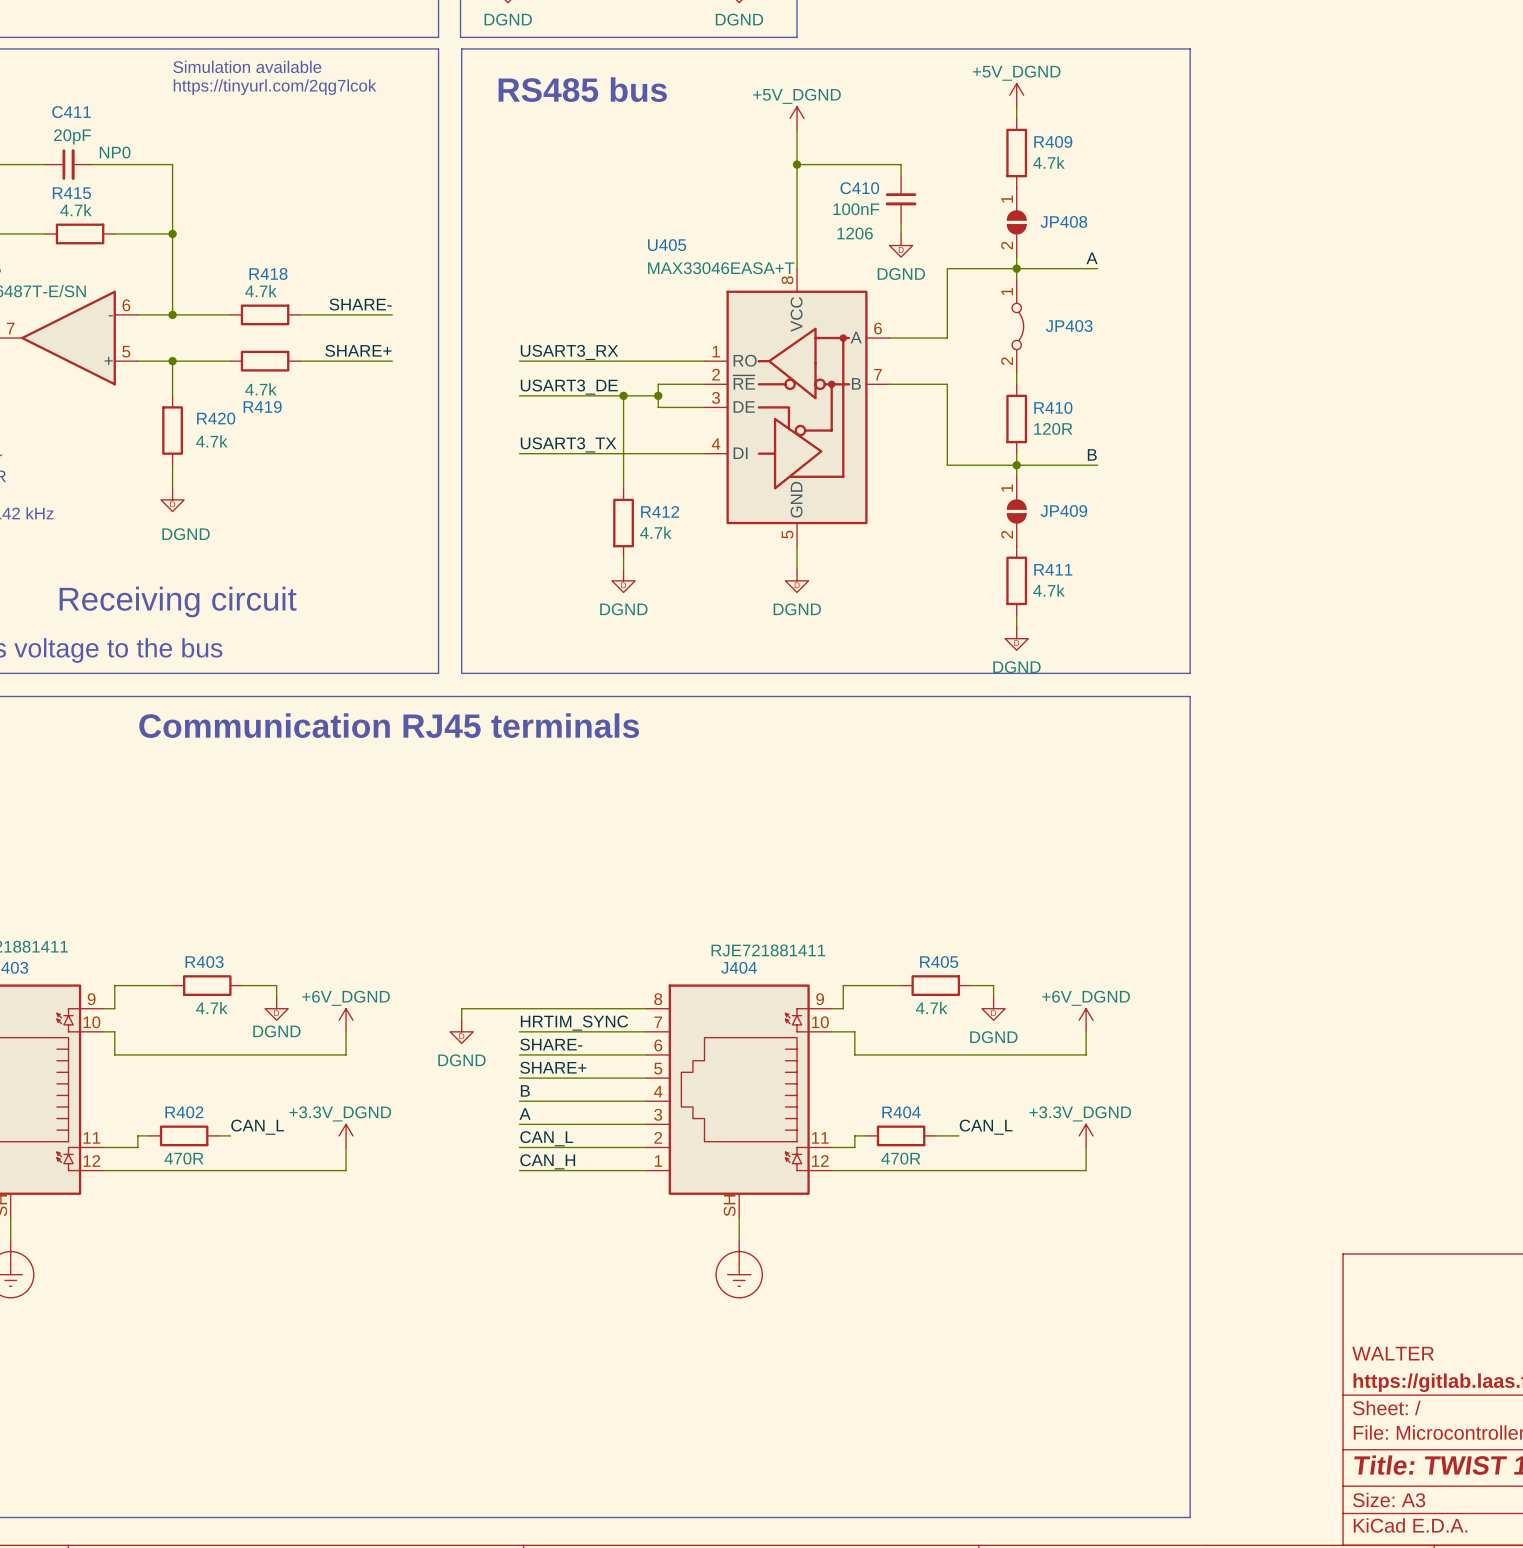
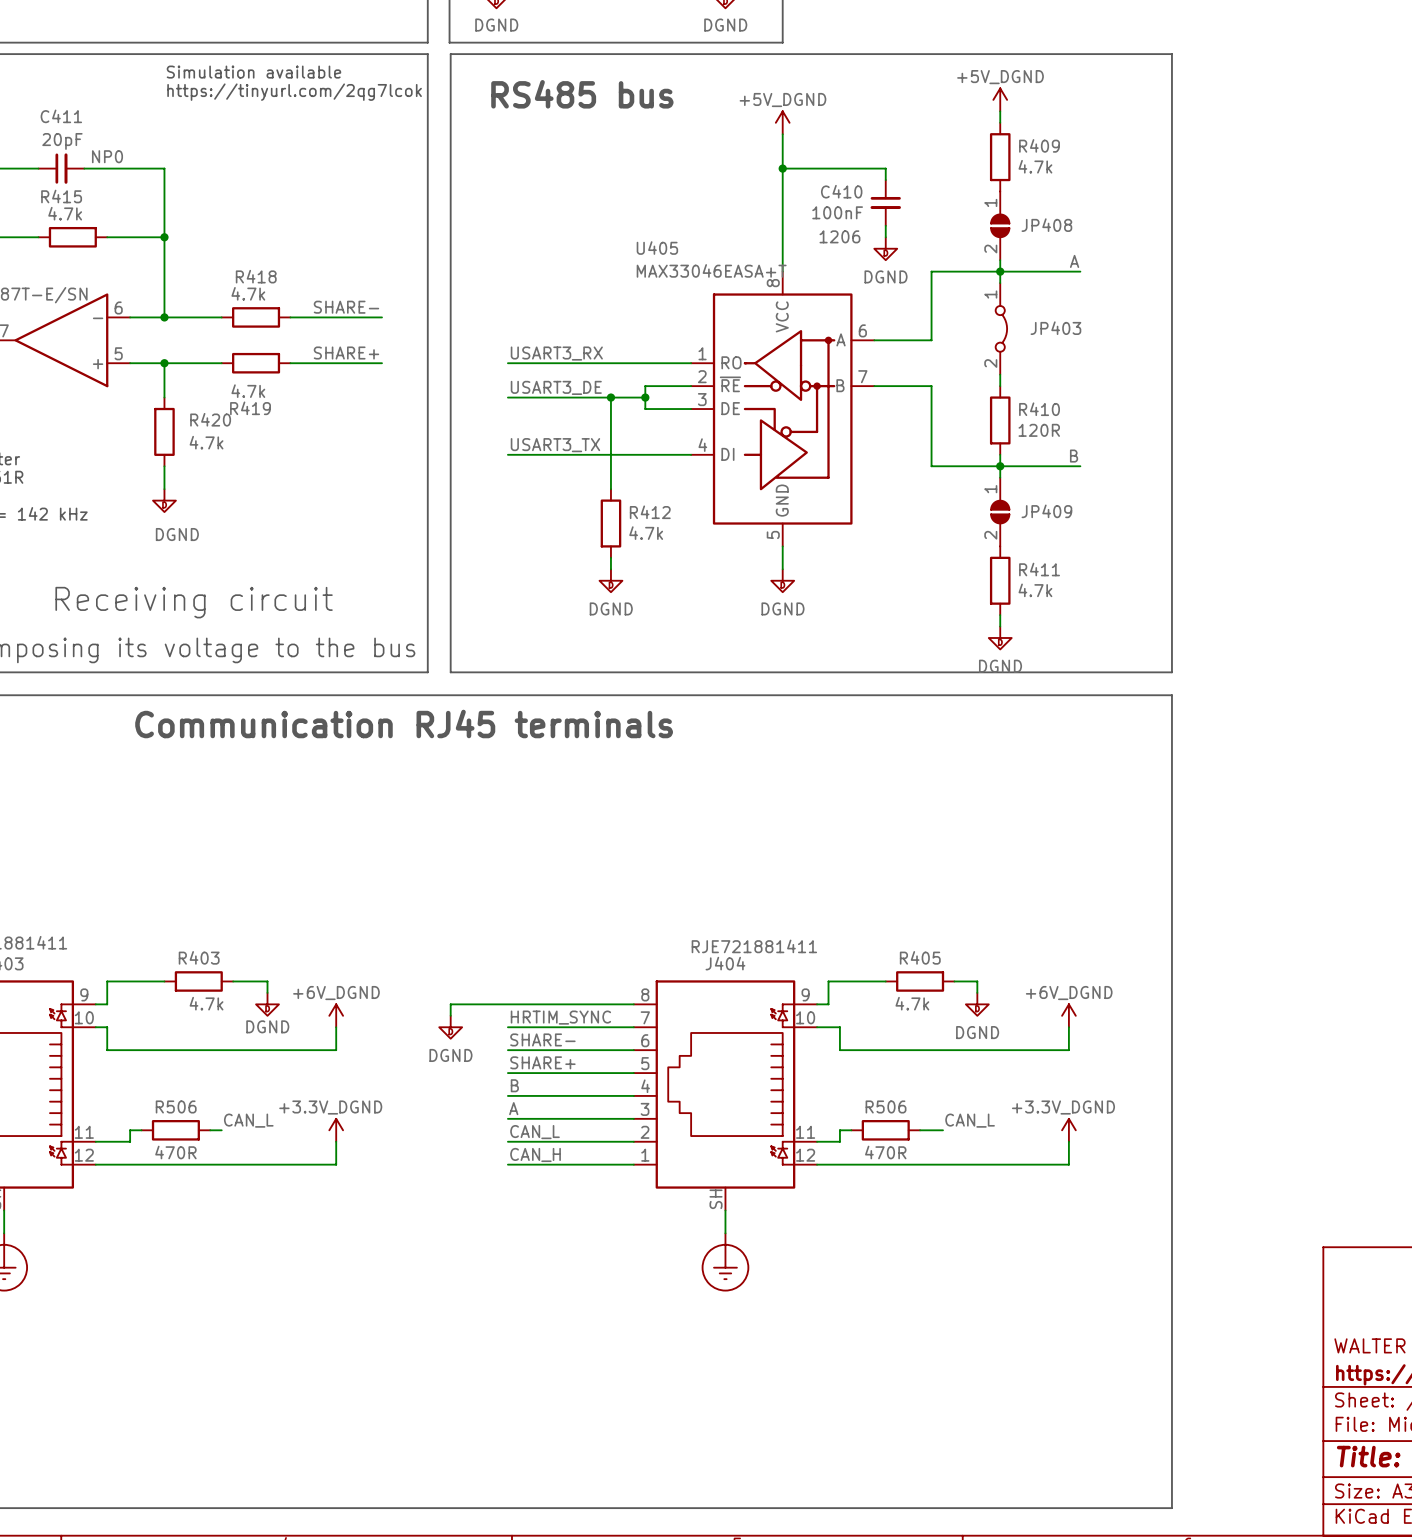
R402 name: R402 (184, 1112) -> R506 (176, 1106)
R404 name: R404 (901, 1112) -> R506 (886, 1106)

